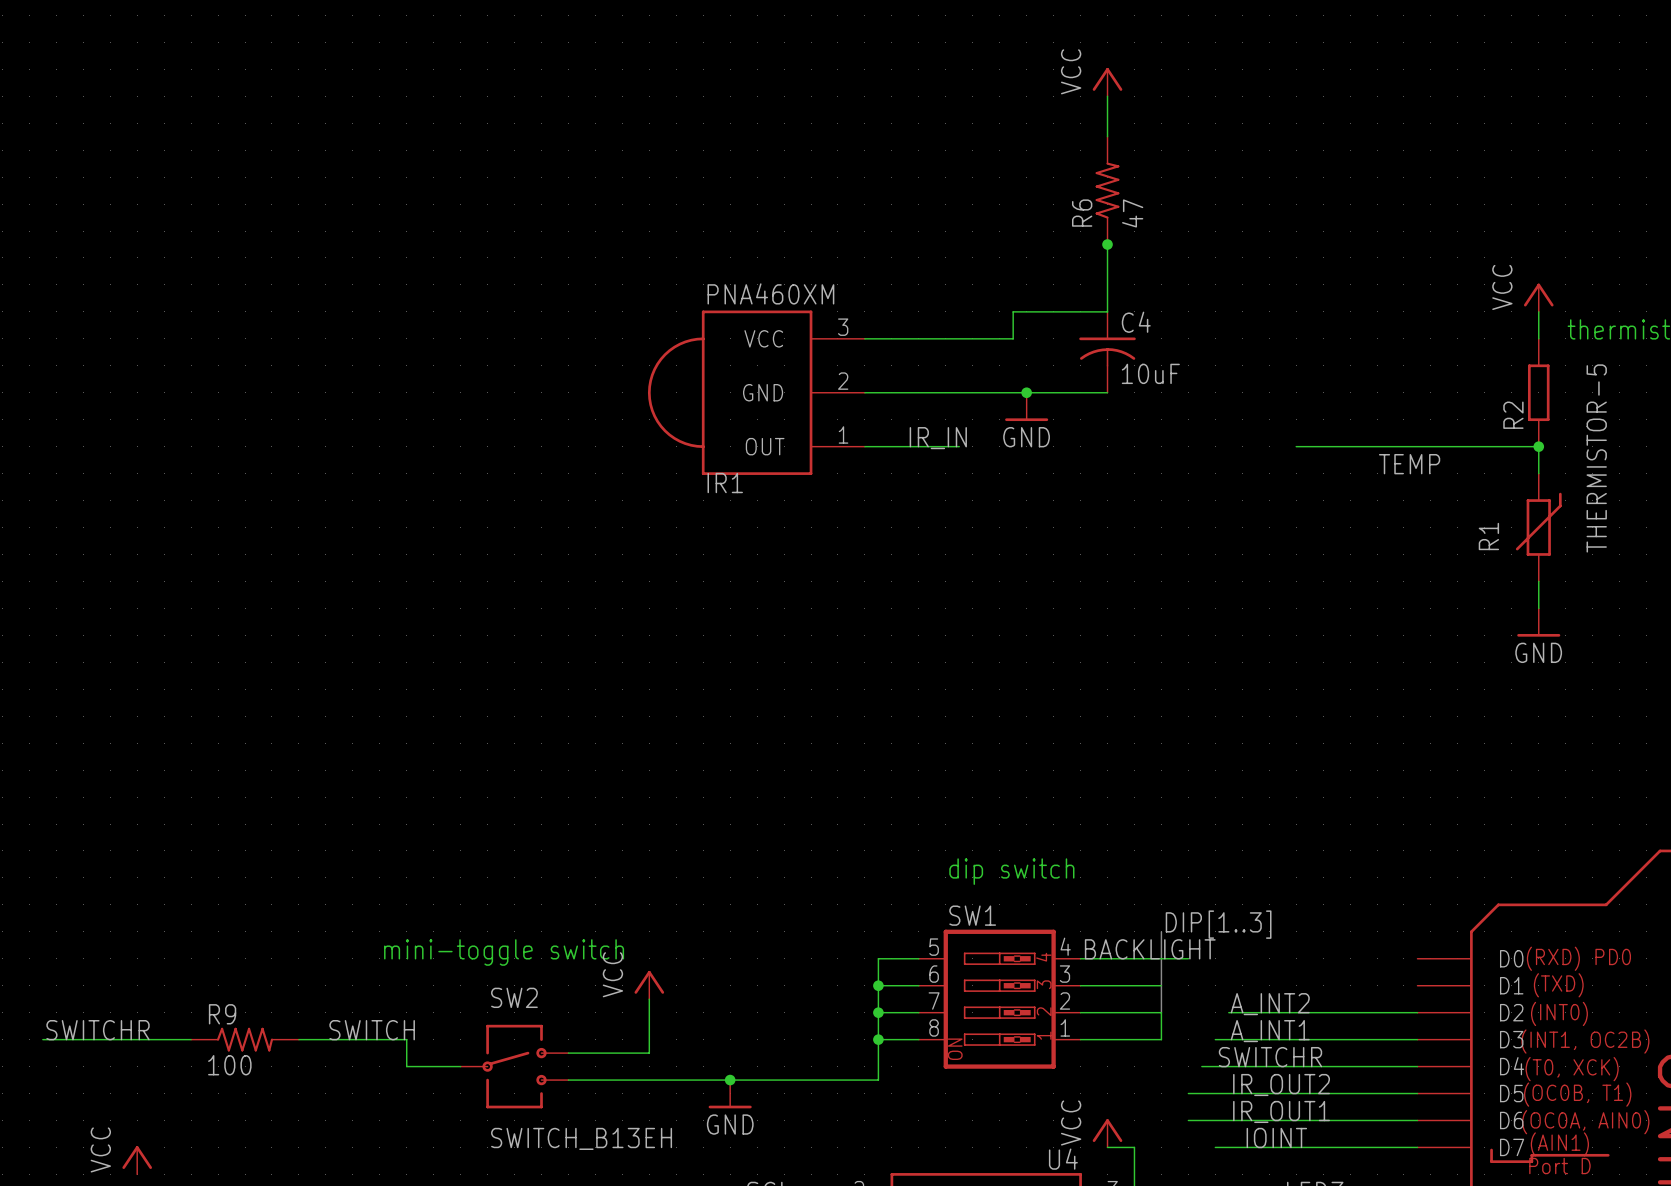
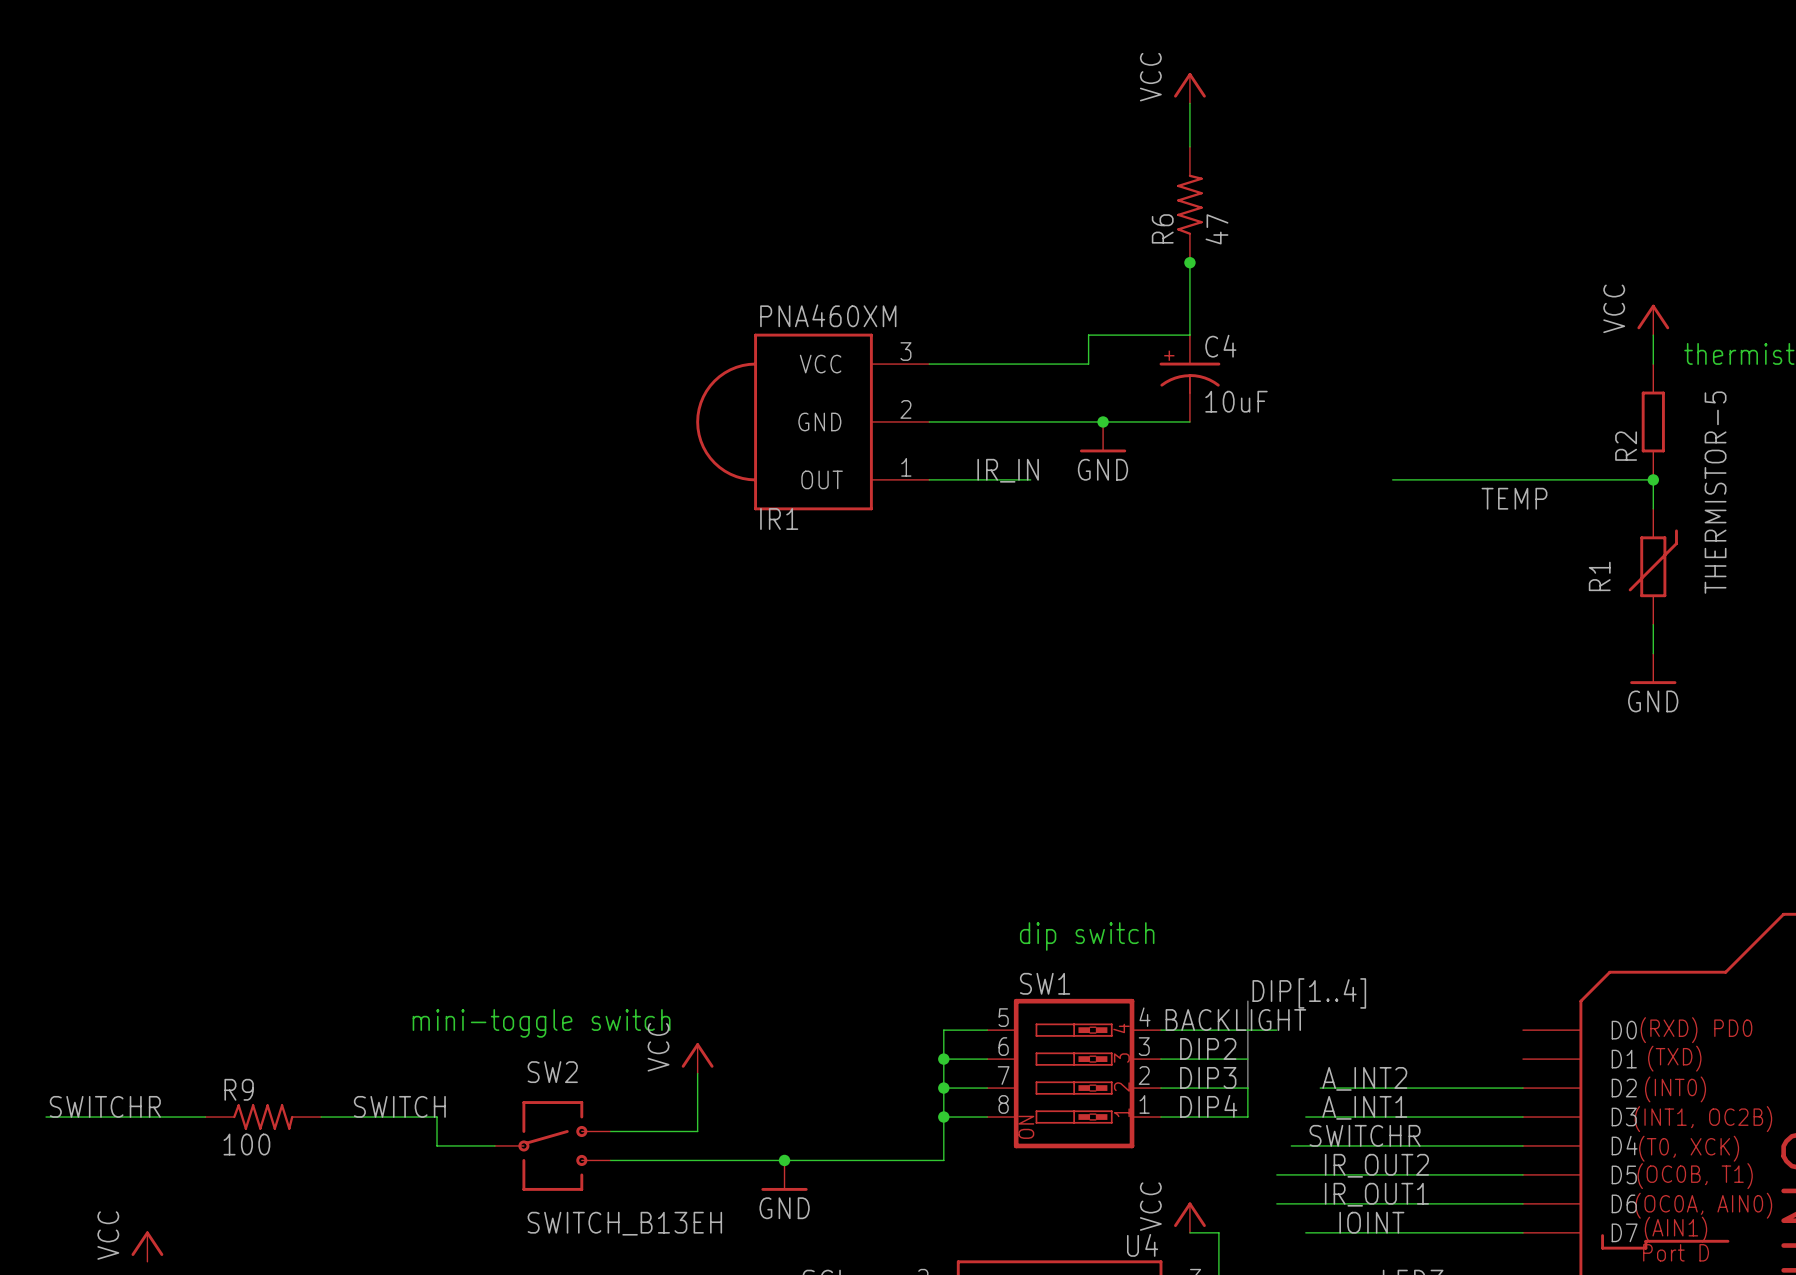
C4 symbol: [1079, 311, 1136, 393] -> [1159, 335, 1221, 422]
label: DIP[1..3] (1218, 924) -> DIP[1..4] (1309, 993)
label: none -> DIP2 (1208, 1048)
label: none -> DIP3 (1208, 1077)
label: none -> DIP4 (1208, 1106)

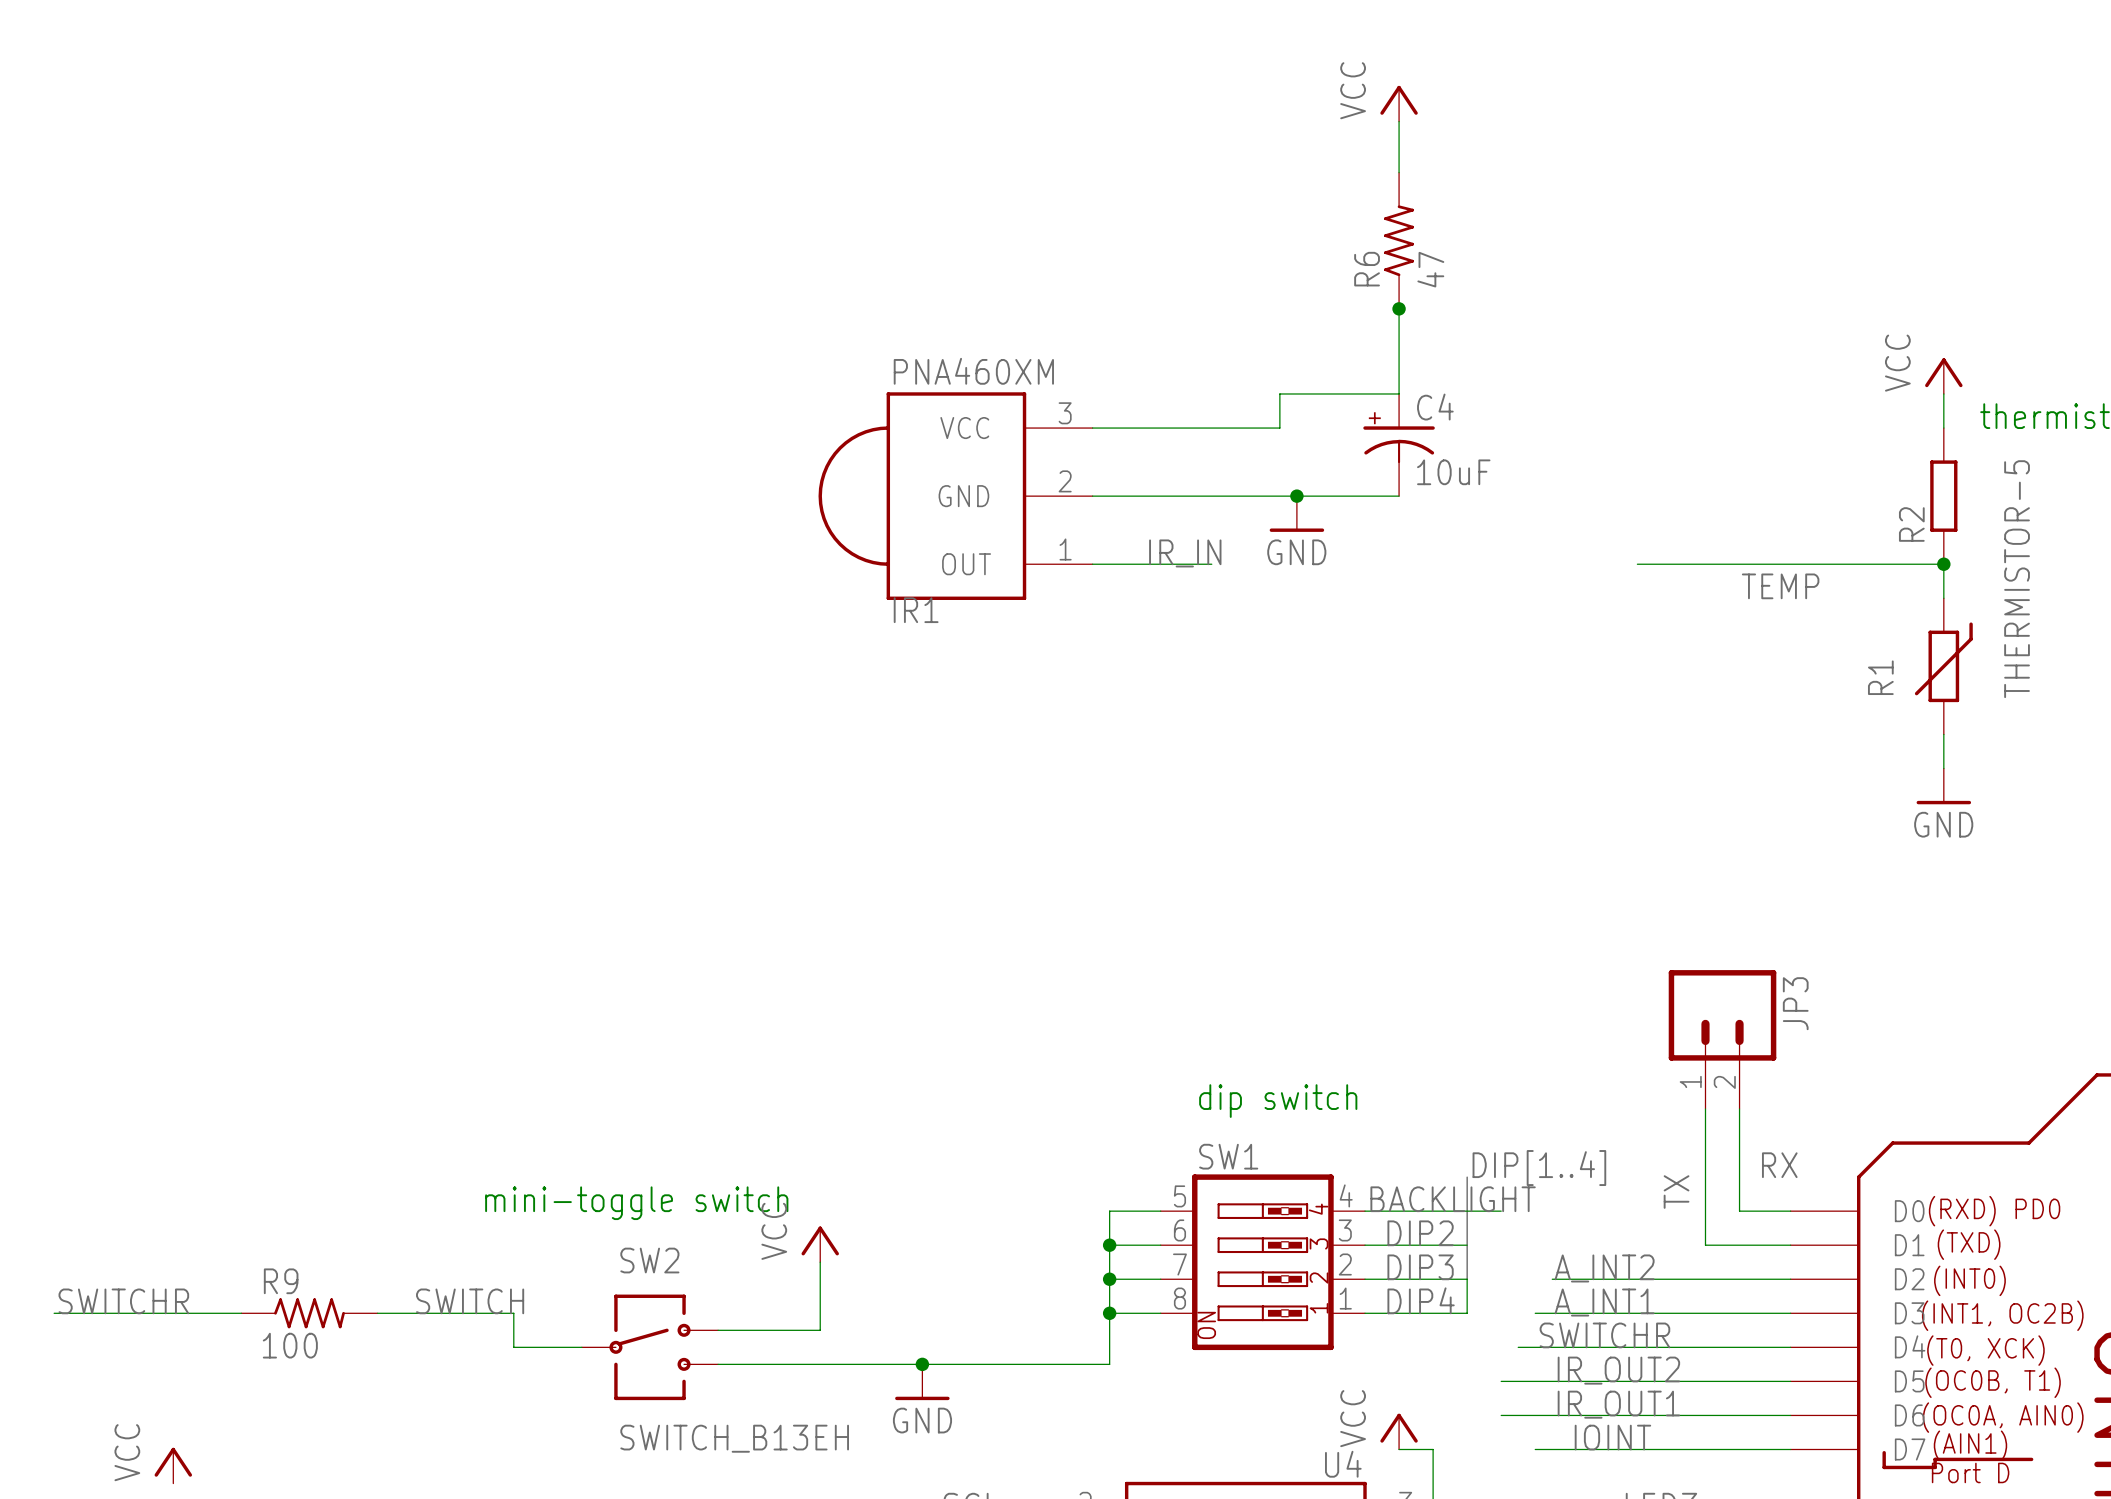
JP3: none -> (1722, 1039)
wire: none -> (1705, 1109) (1705, 1245) (1790, 1245)
wire: none -> (1739, 1109) (1739, 1211) (1790, 1211)
label: none -> RX (1779, 1165)
label: none -> TX (1676, 1192)

